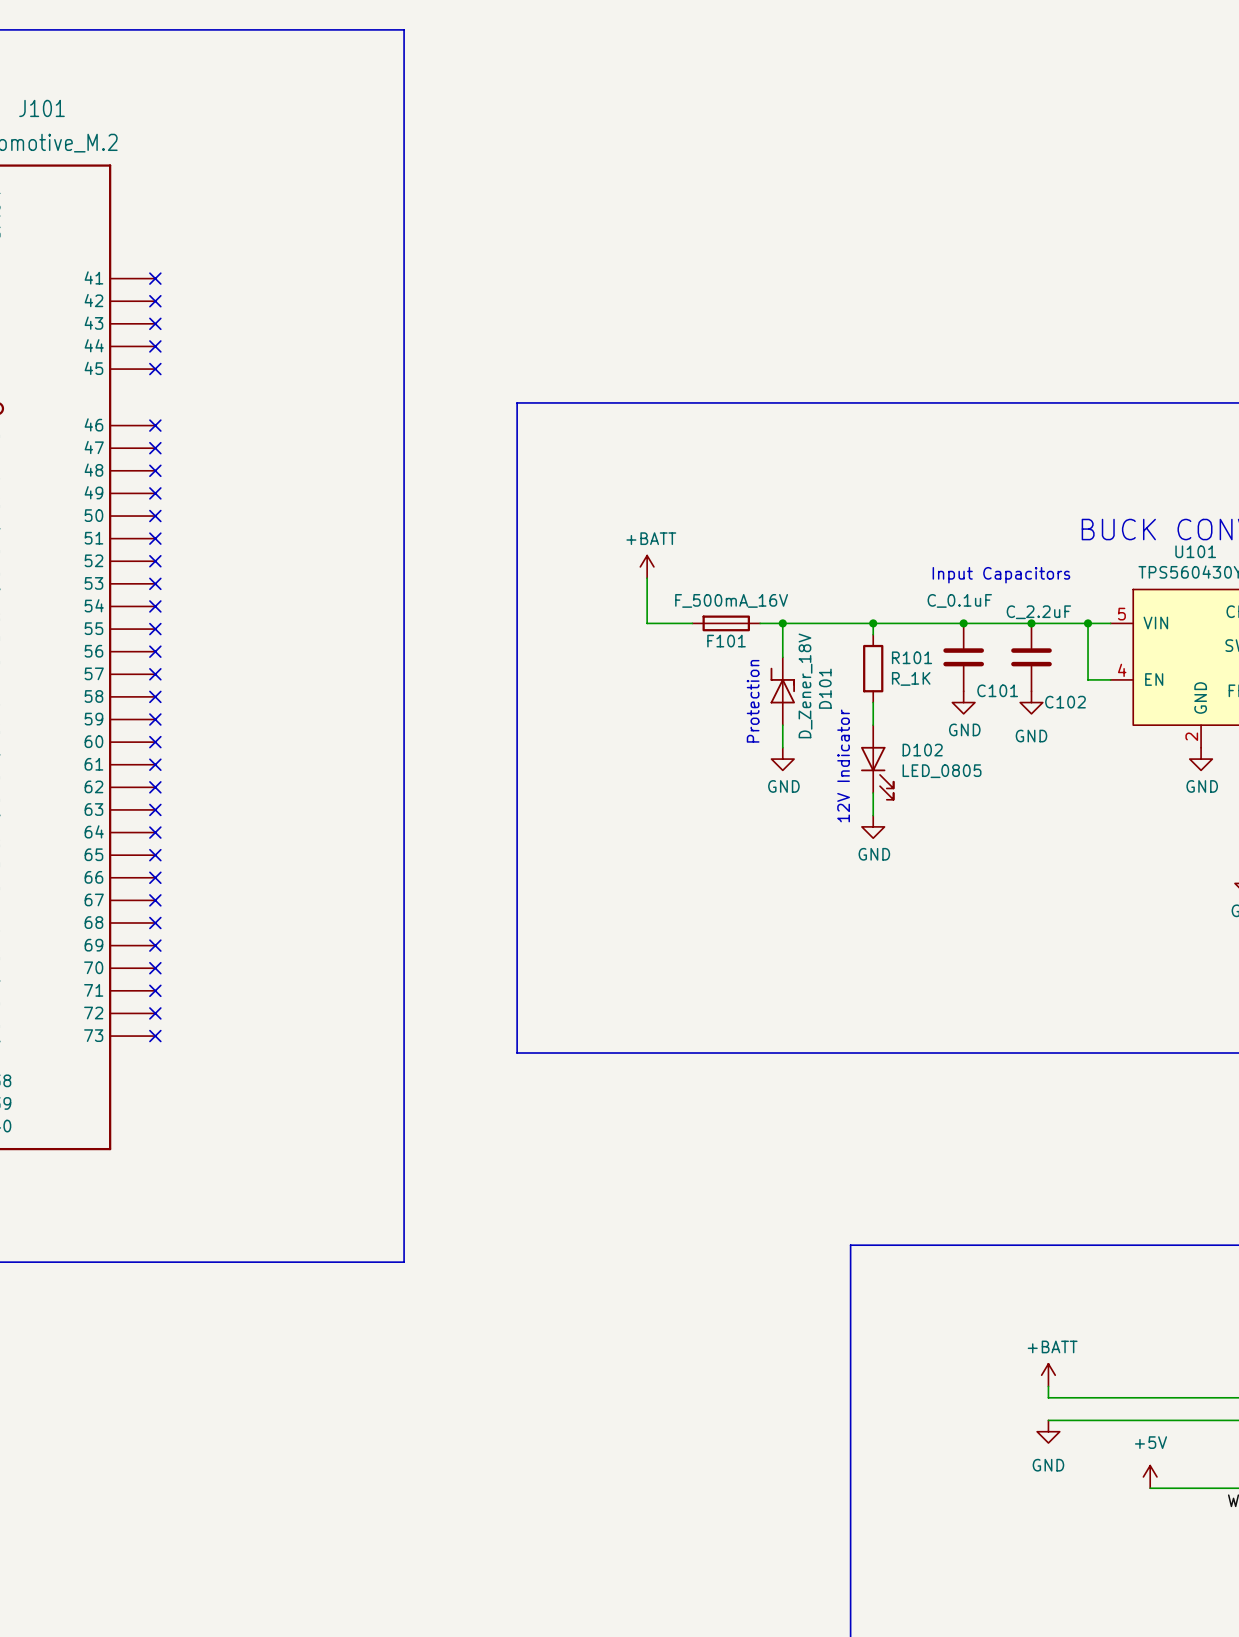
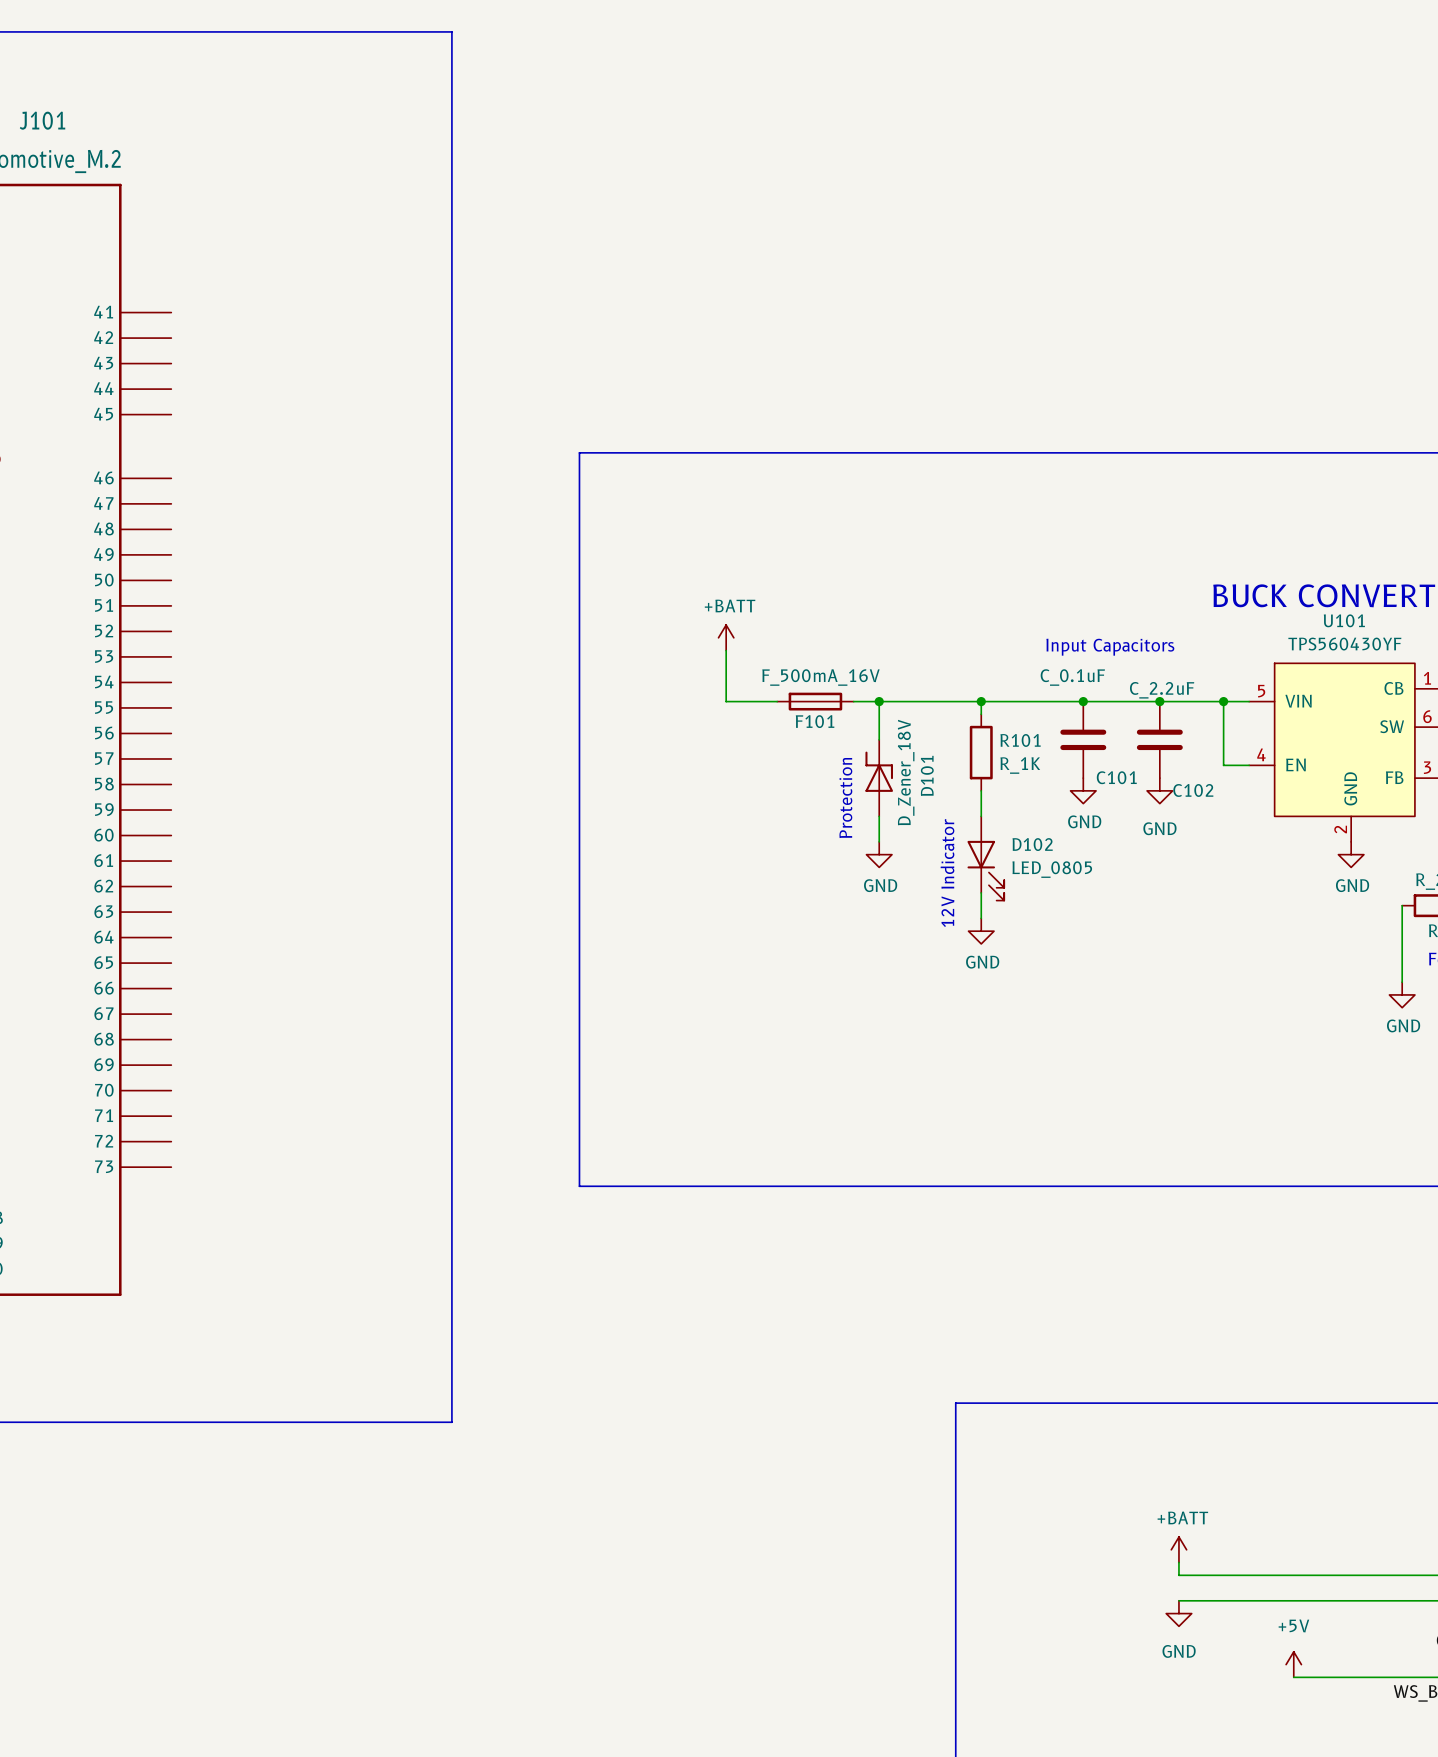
no-connect mark: (155, 278) -> none
no-connect mark: (155, 301) -> none
no-connect mark: (155, 323) -> none
no-connect mark: (155, 346) -> none
no-connect mark: (155, 369) -> none
no-connect mark: (155, 425) -> none
no-connect mark: (155, 448) -> none
no-connect mark: (155, 470) -> none
no-connect mark: (155, 493) -> none
no-connect mark: (155, 516) -> none
no-connect mark: (155, 538) -> none
no-connect mark: (155, 561) -> none
no-connect mark: (155, 583) -> none
no-connect mark: (155, 606) -> none
no-connect mark: (155, 629) -> none
no-connect mark: (155, 651) -> none
no-connect mark: (155, 674) -> none
no-connect mark: (155, 696) -> none
no-connect mark: (155, 719) -> none
no-connect mark: (155, 742) -> none
no-connect mark: (155, 764) -> none
no-connect mark: (155, 787) -> none
no-connect mark: (155, 809) -> none
no-connect mark: (155, 832) -> none
no-connect mark: (155, 855) -> none
no-connect mark: (155, 877) -> none
no-connect mark: (155, 900) -> none
no-connect mark: (155, 922) -> none
no-connect mark: (155, 945) -> none
no-connect mark: (155, 968) -> none
no-connect mark: (155, 990) -> none
no-connect mark: (155, 1013) -> none
no-connect mark: (155, 1036) -> none

